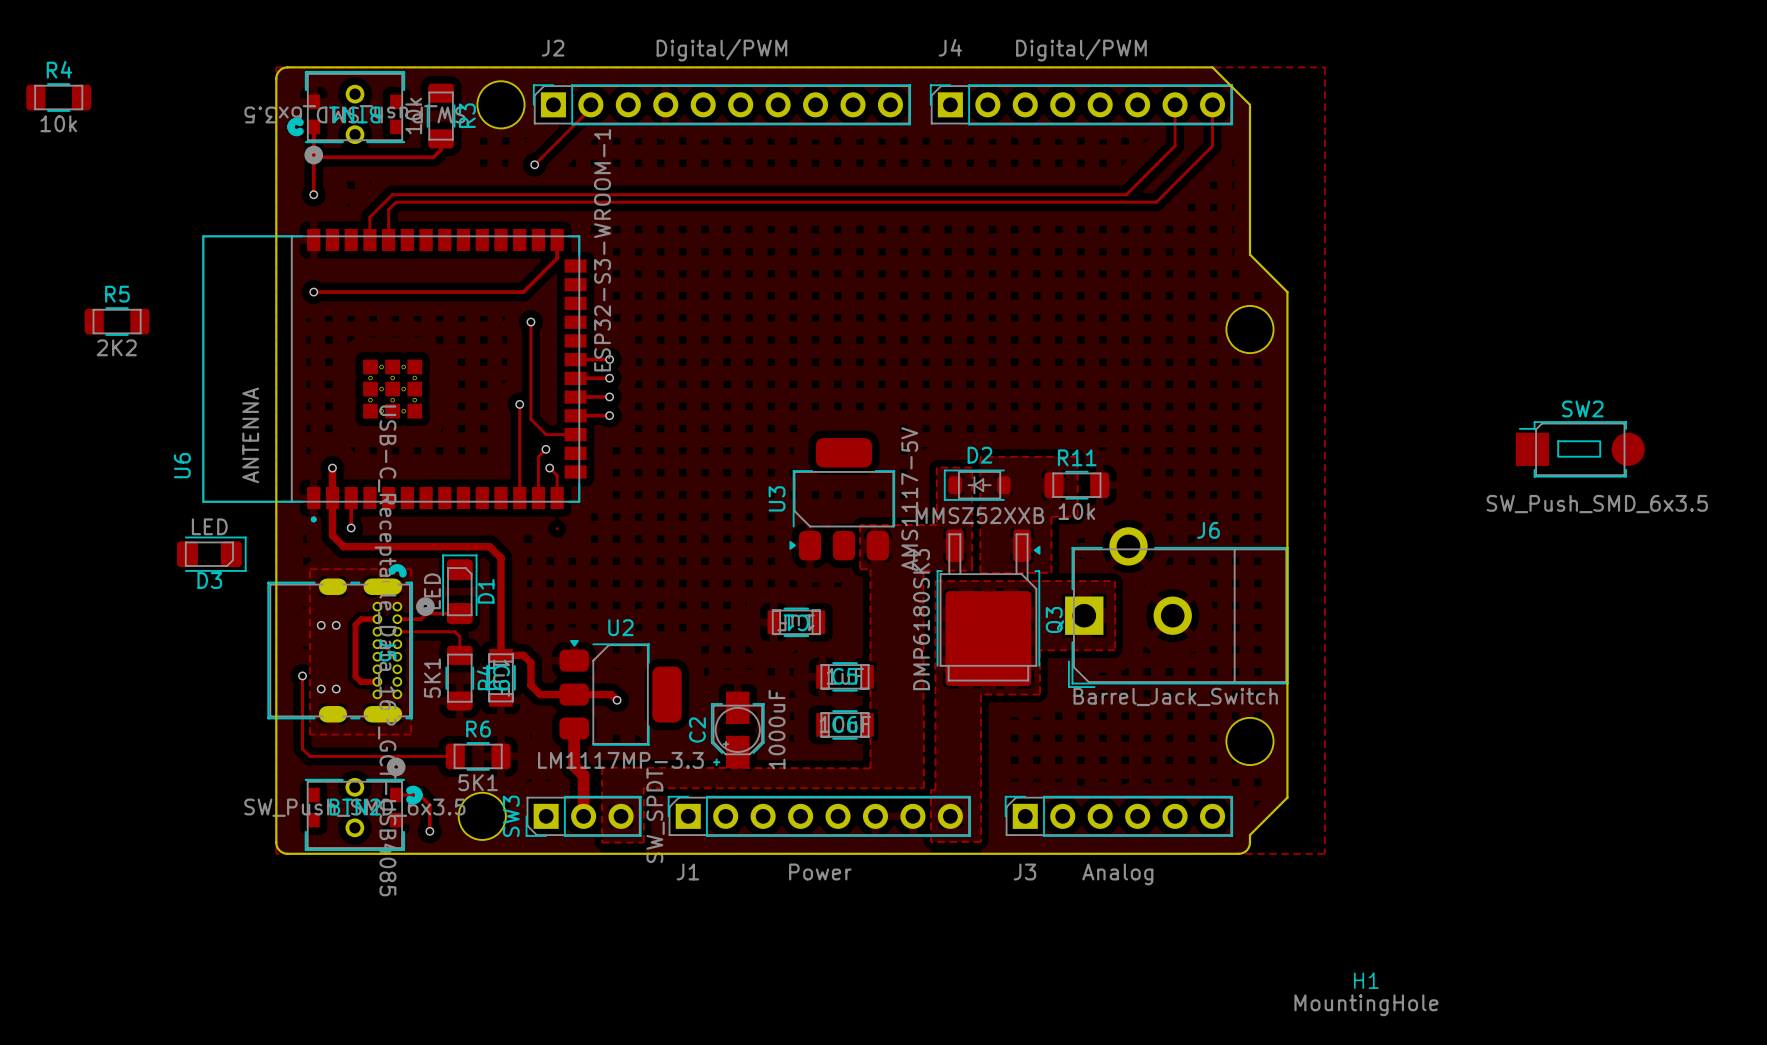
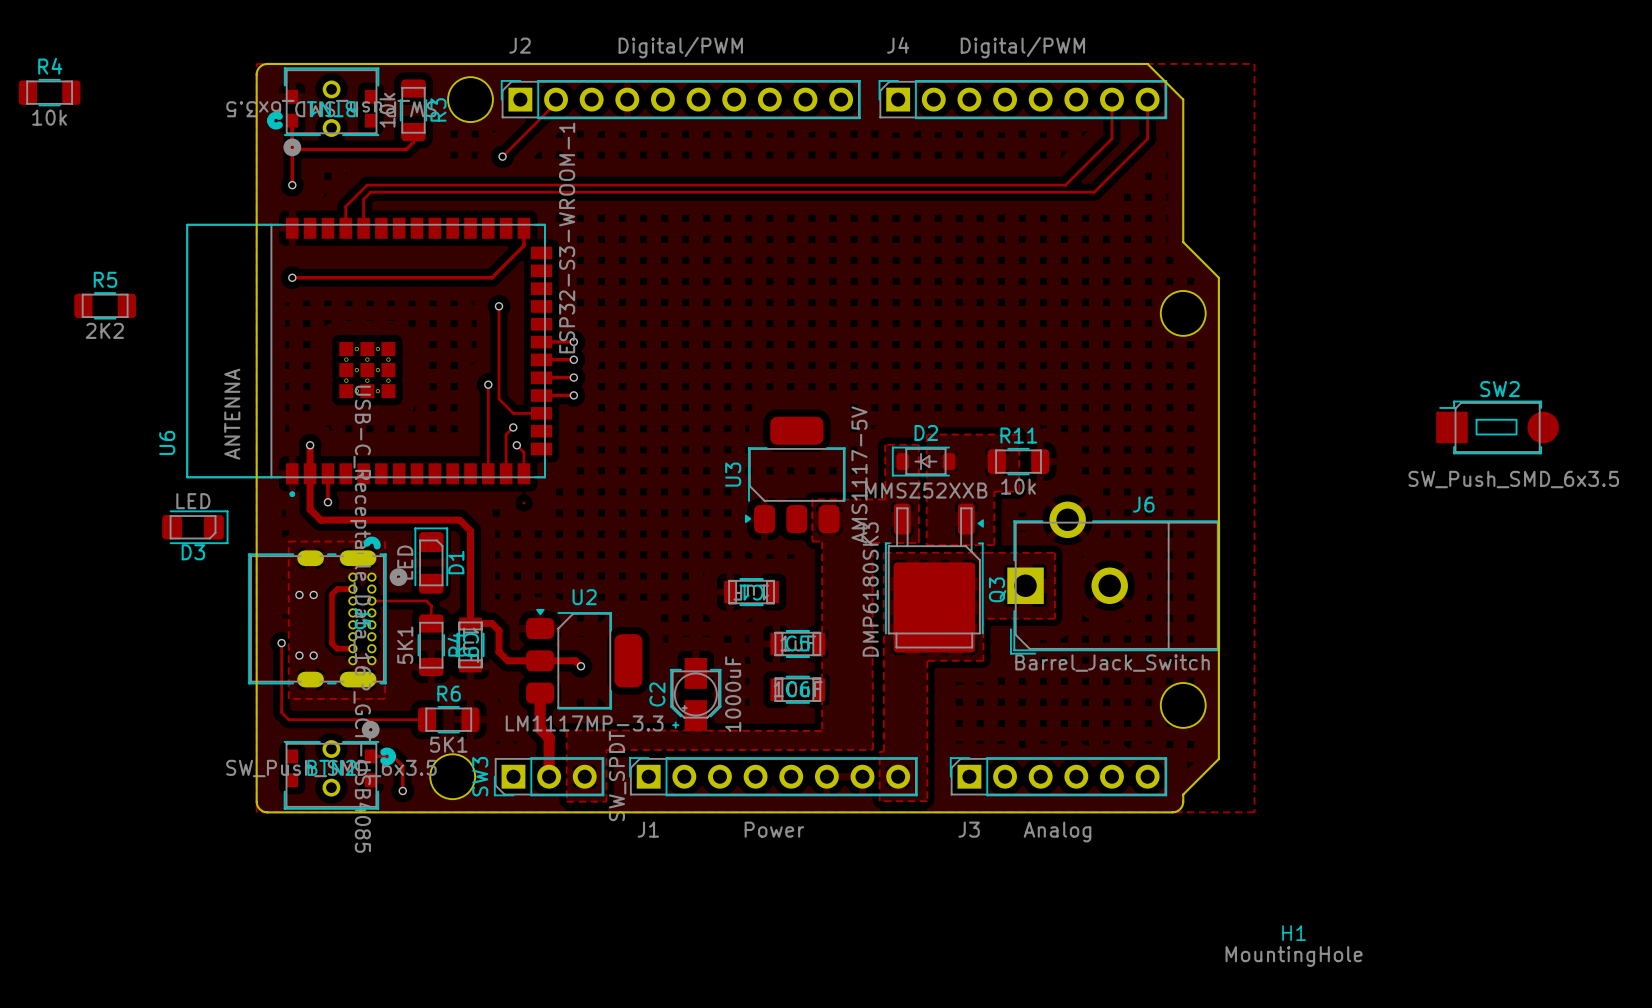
track: (459, 613) (426, 613) (421, 619) (397, 619) -> none

